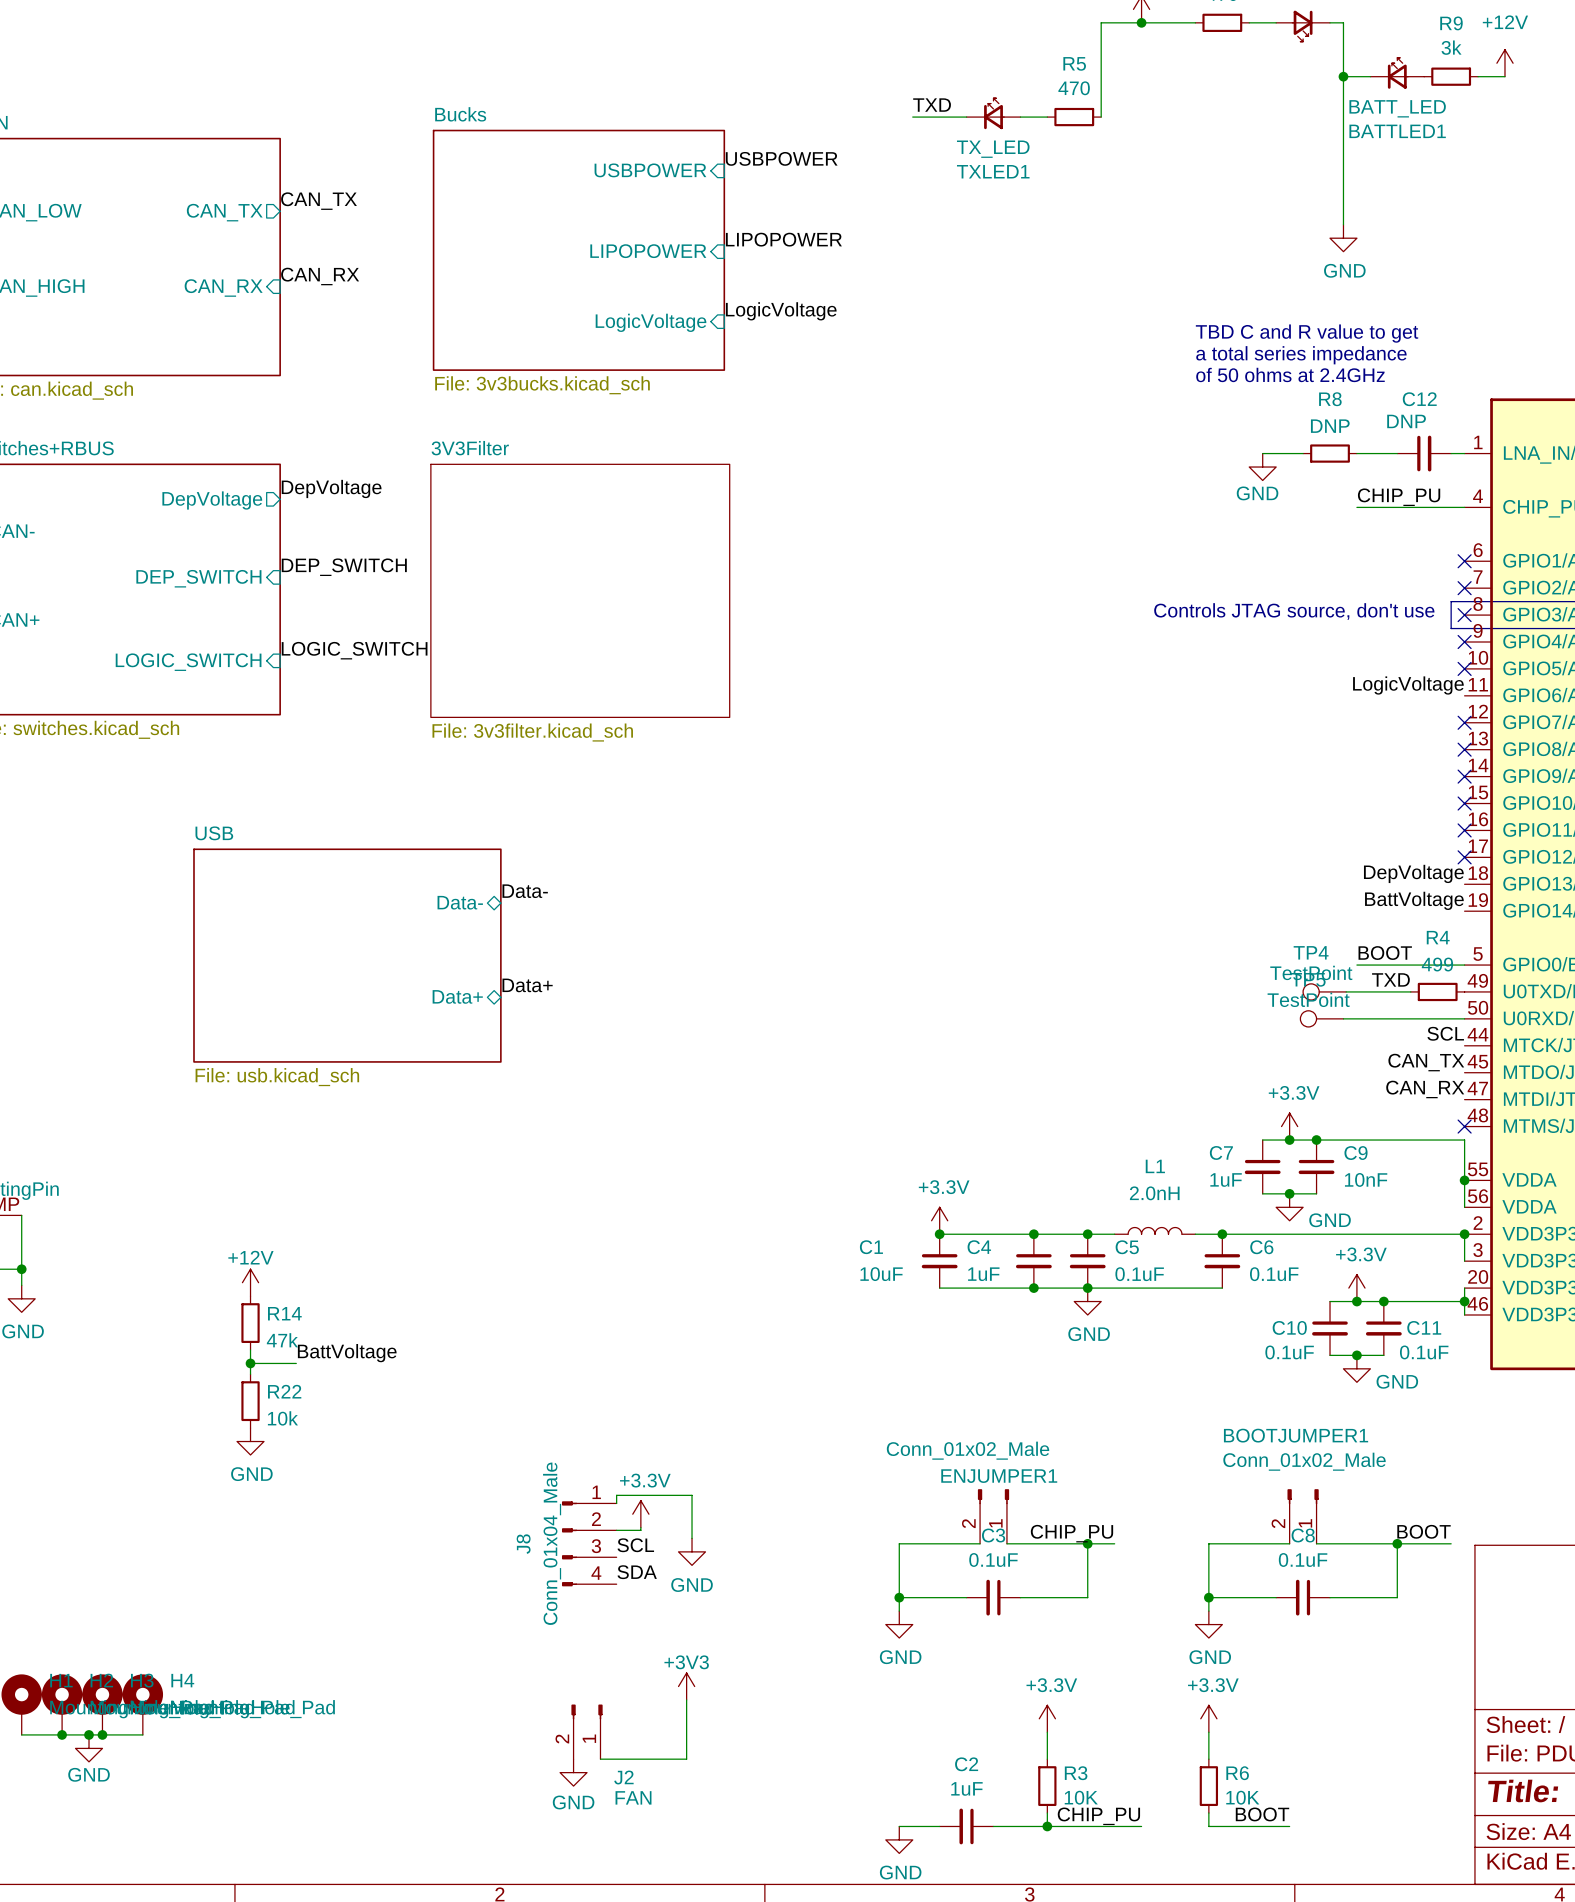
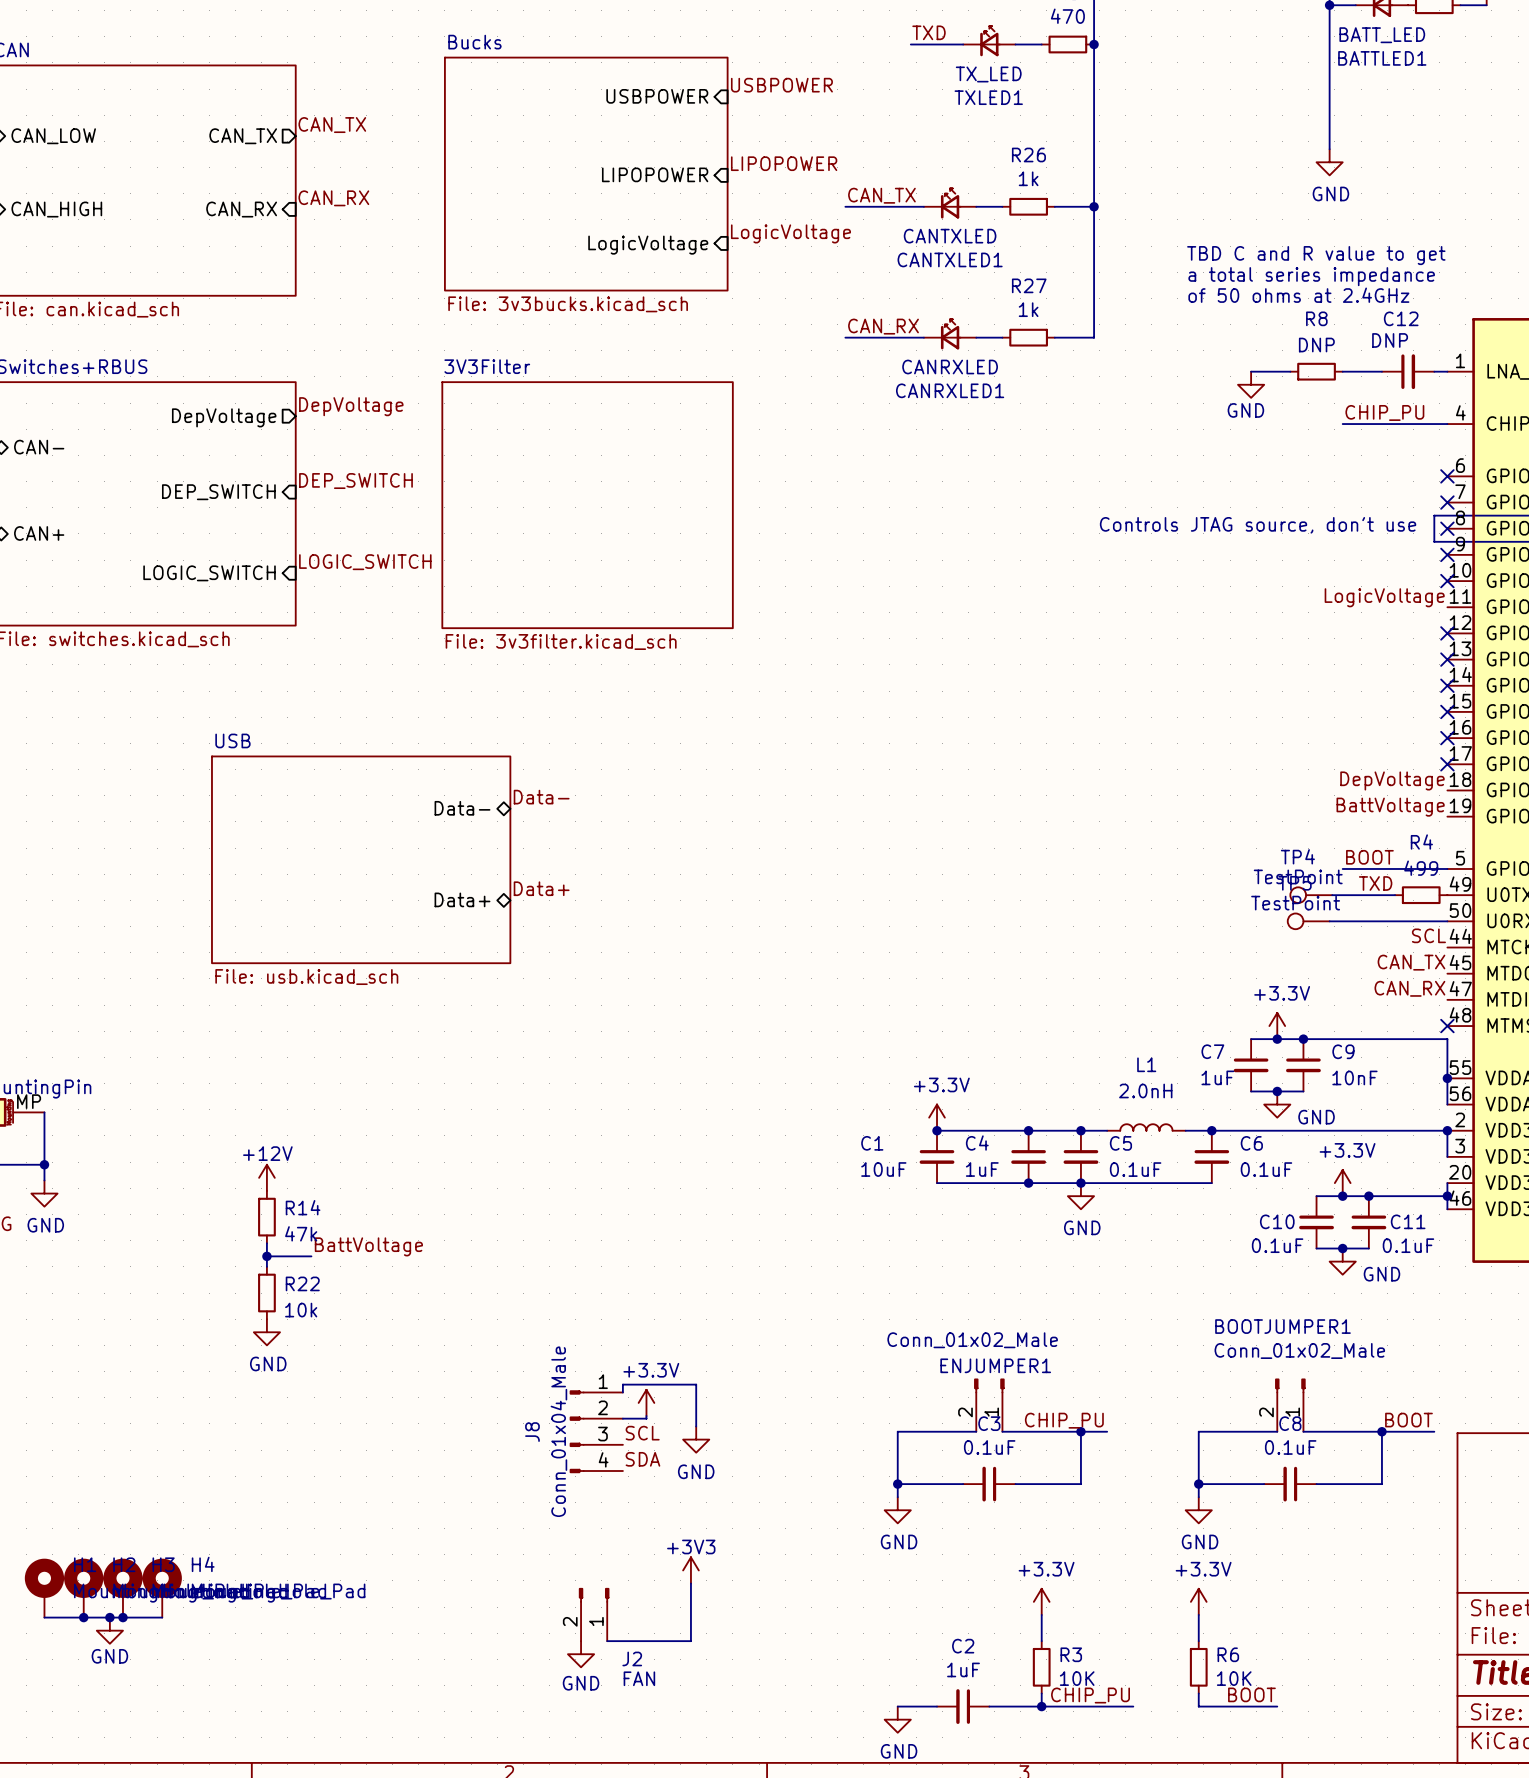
wire: none -> (1094, 44) (1094, 337) (1054, 337)
junction: none -> (1094, 44)
label: none -> CAN_TX (881, 195)
CANTXLED1: none -> CANTXLED (950, 203)
wire: none -> (845, 206) (923, 206)
wire: none -> (976, 206) (1002, 206)
R26: none -> 1k (1028, 206)
wire: none -> (1054, 206) (1094, 206)
junction: none -> (1094, 206)
label: none -> CAN_RX (883, 326)
CANRXLED1: none -> CANRXLED (950, 334)
wire: none -> (845, 337) (923, 337)
wire: none -> (976, 337) (1002, 337)
R27: none -> 1k (1028, 337)

